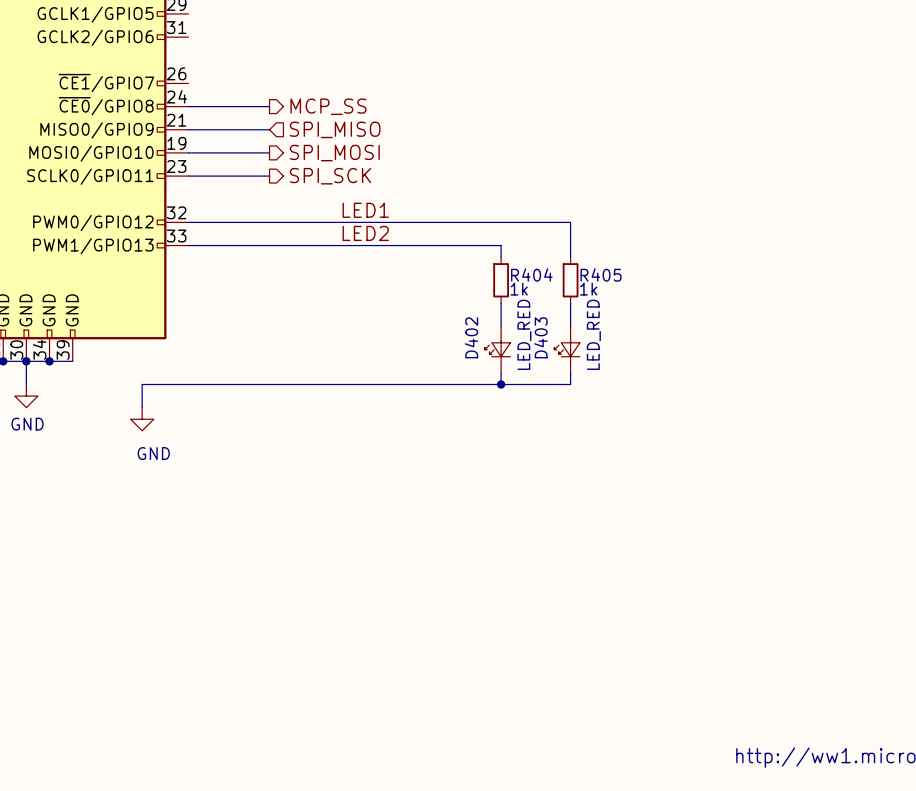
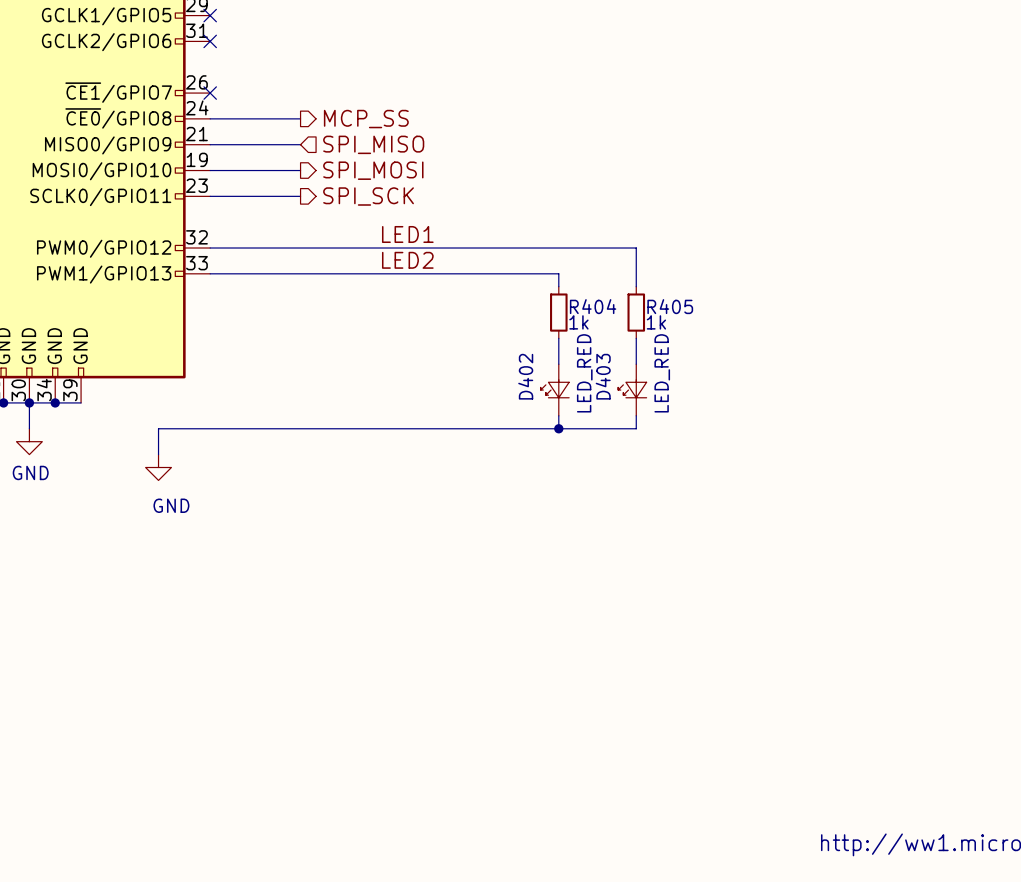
no-connect mark: none -> (210, 15)
no-connect mark: none -> (210, 41)
no-connect mark: none -> (210, 93)

